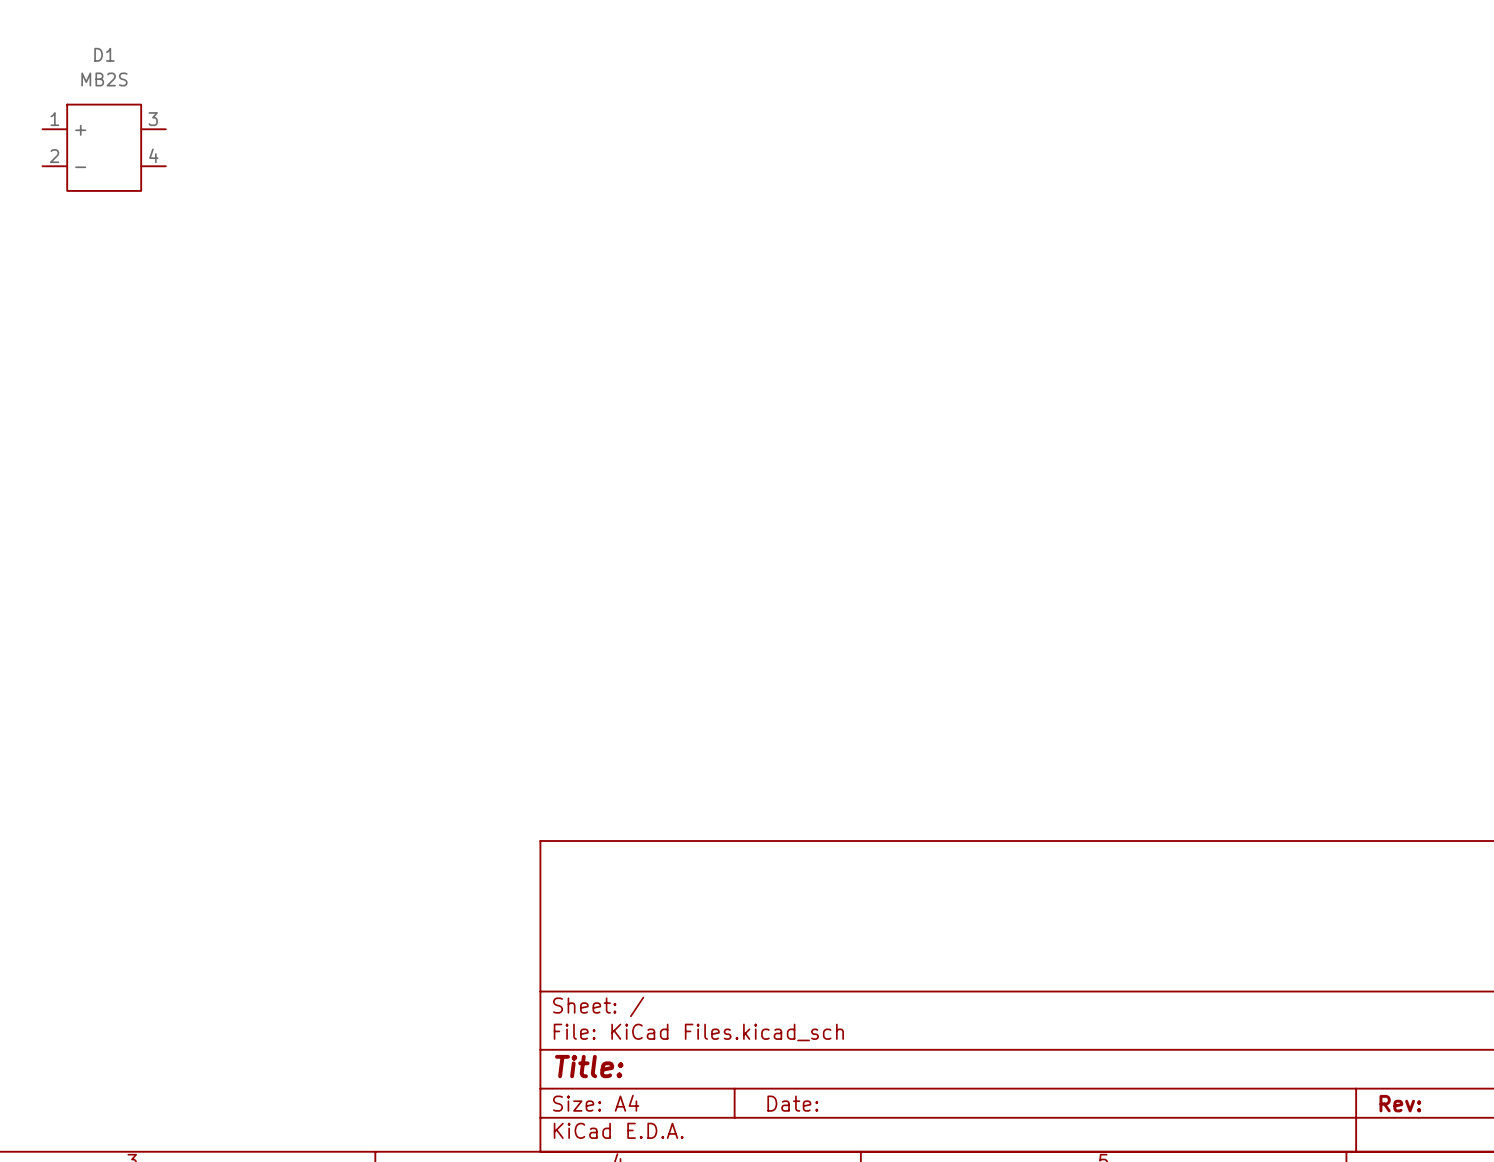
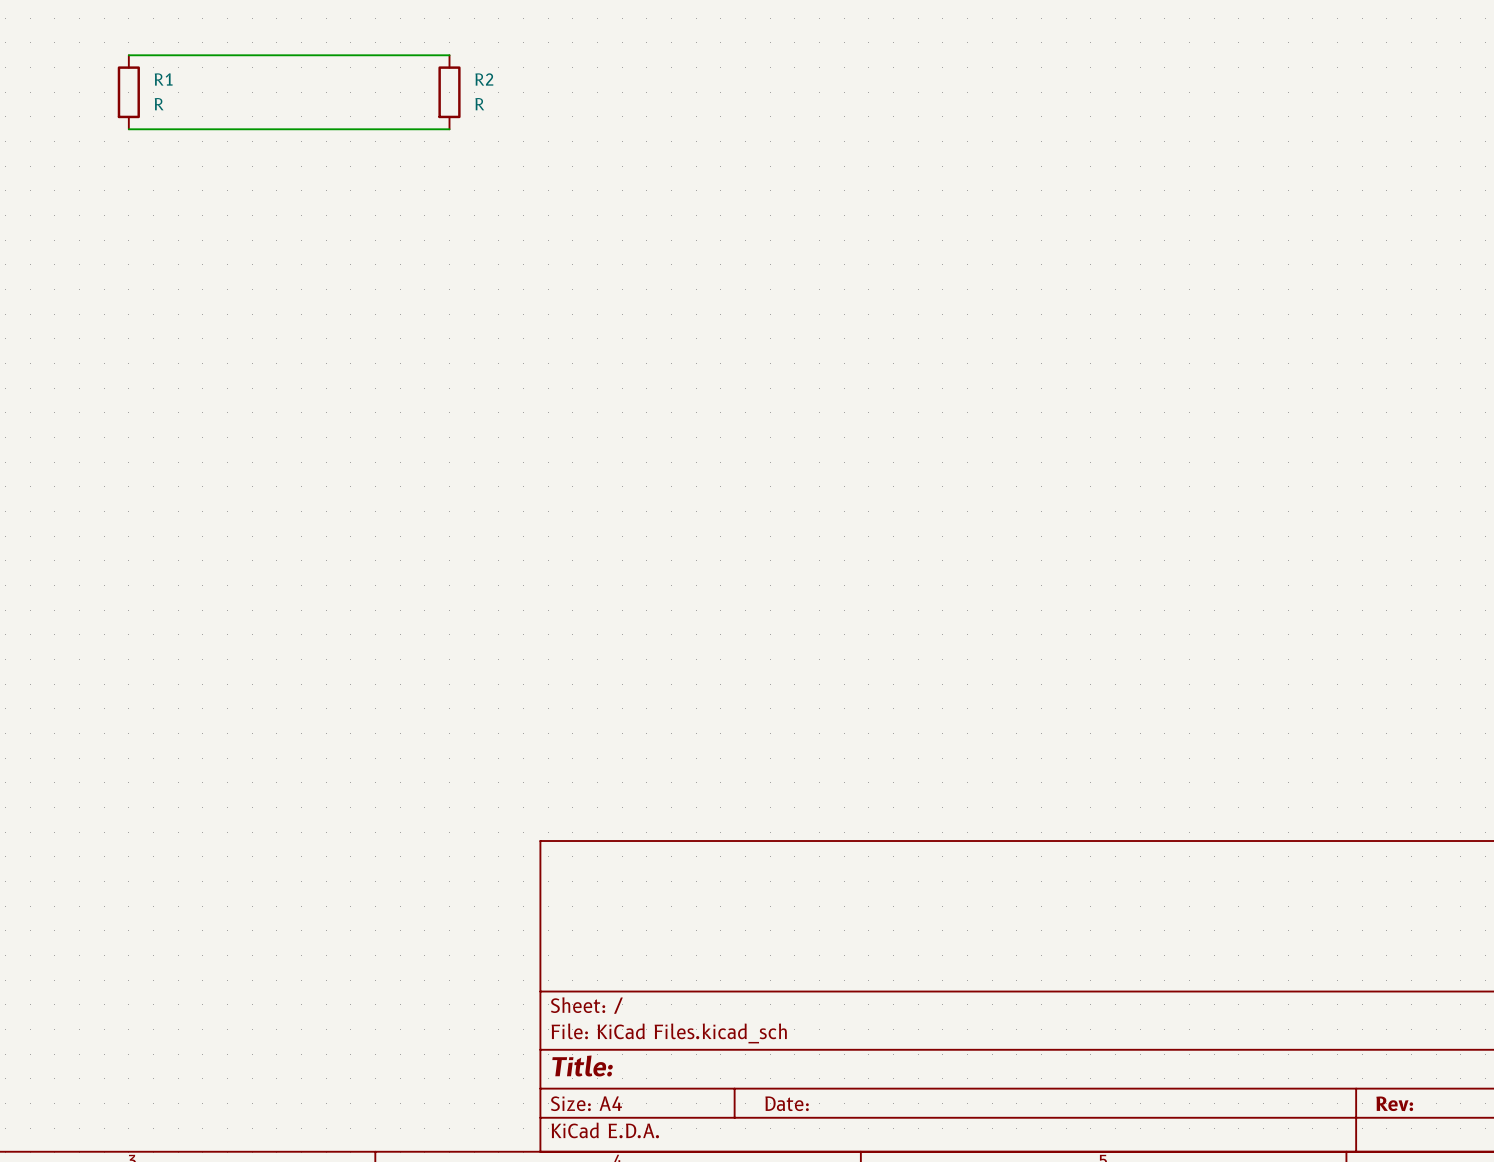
wire: none -> (128, 55) (449, 55)
R1: none -> R (128, 92)
R2: none -> R (449, 92)
wire: none -> (128, 129) (449, 129)
D1: MB2S (104, 147) -> none

